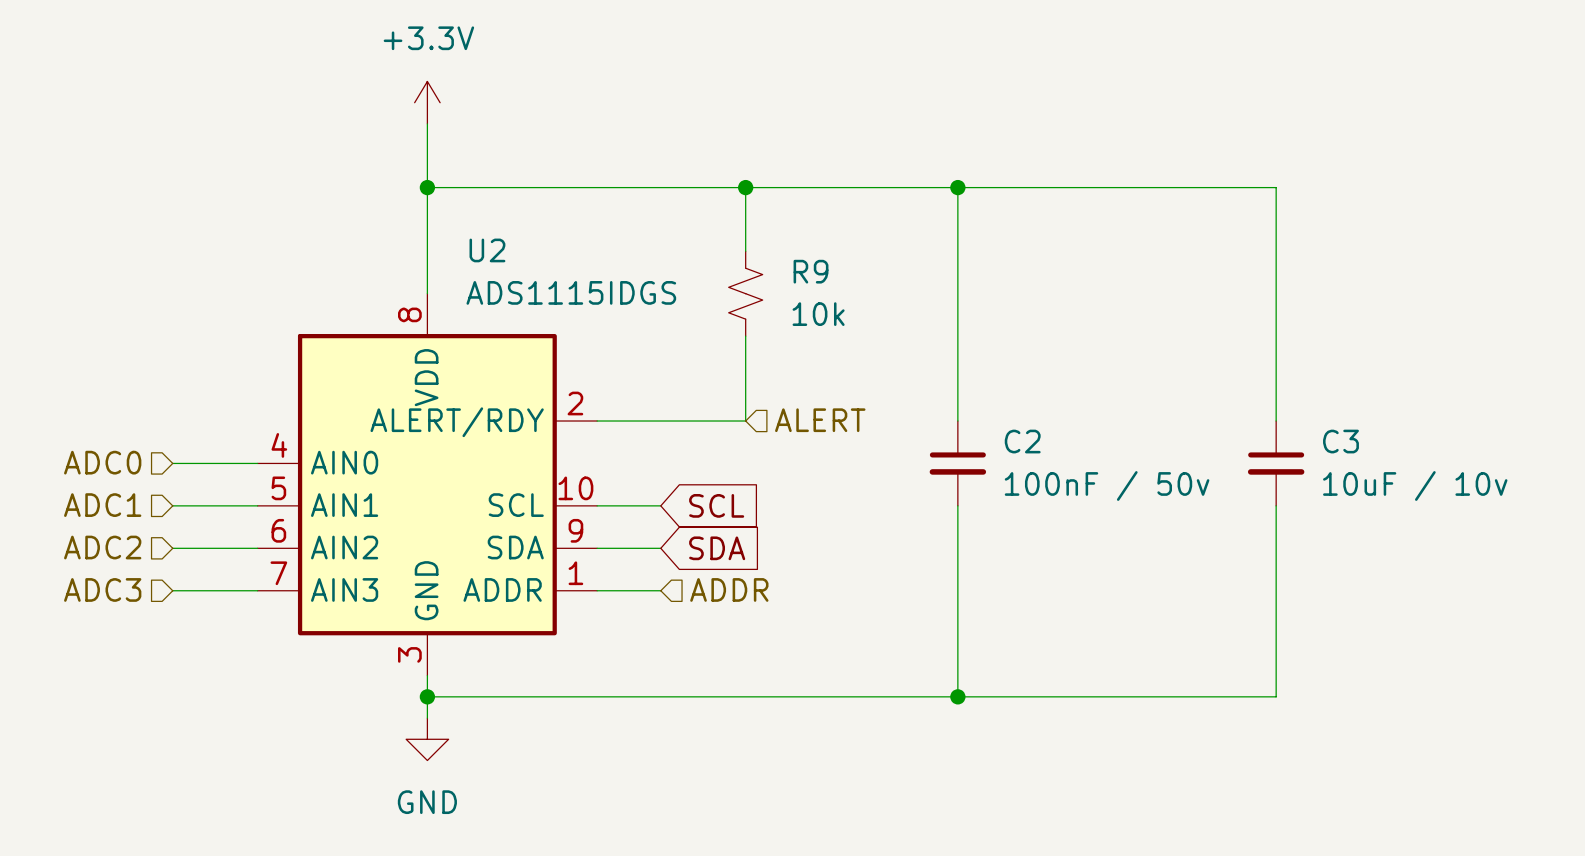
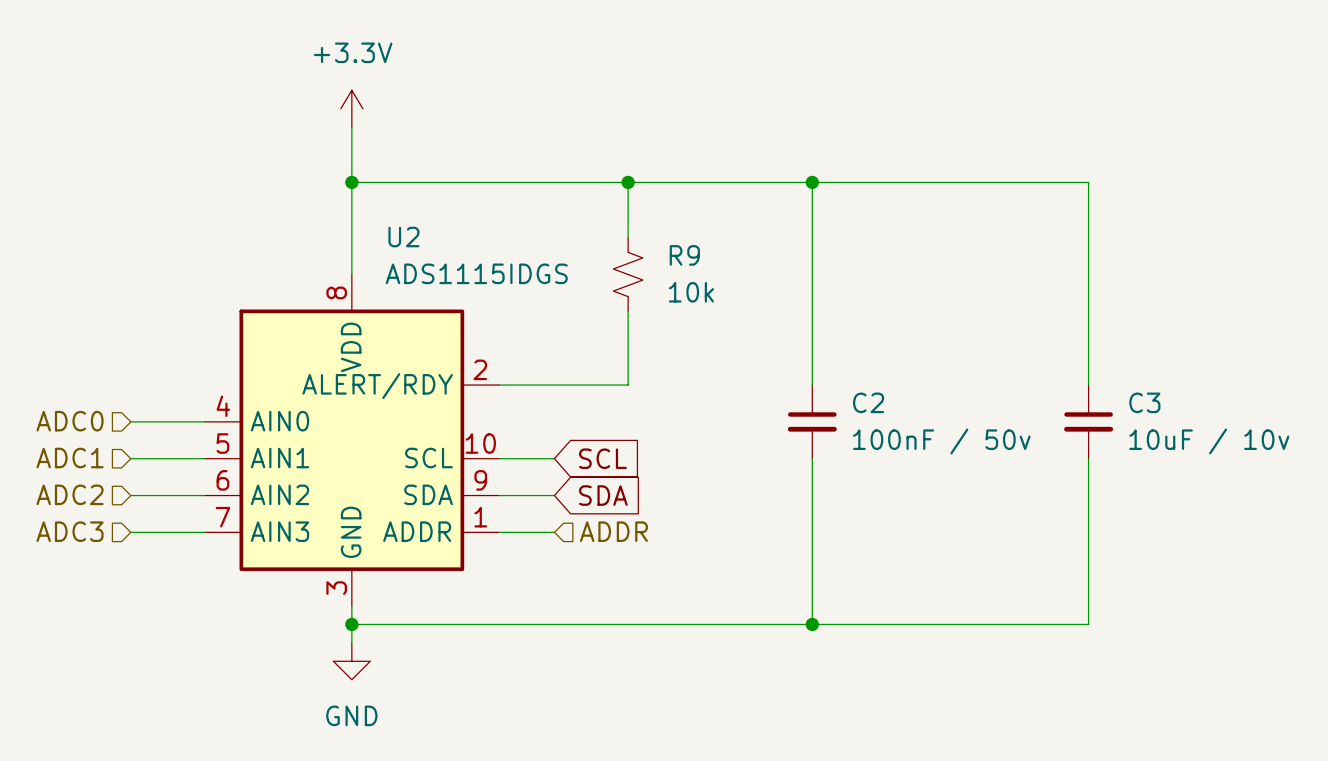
hierarchical label: ALERT (820, 420) -> none

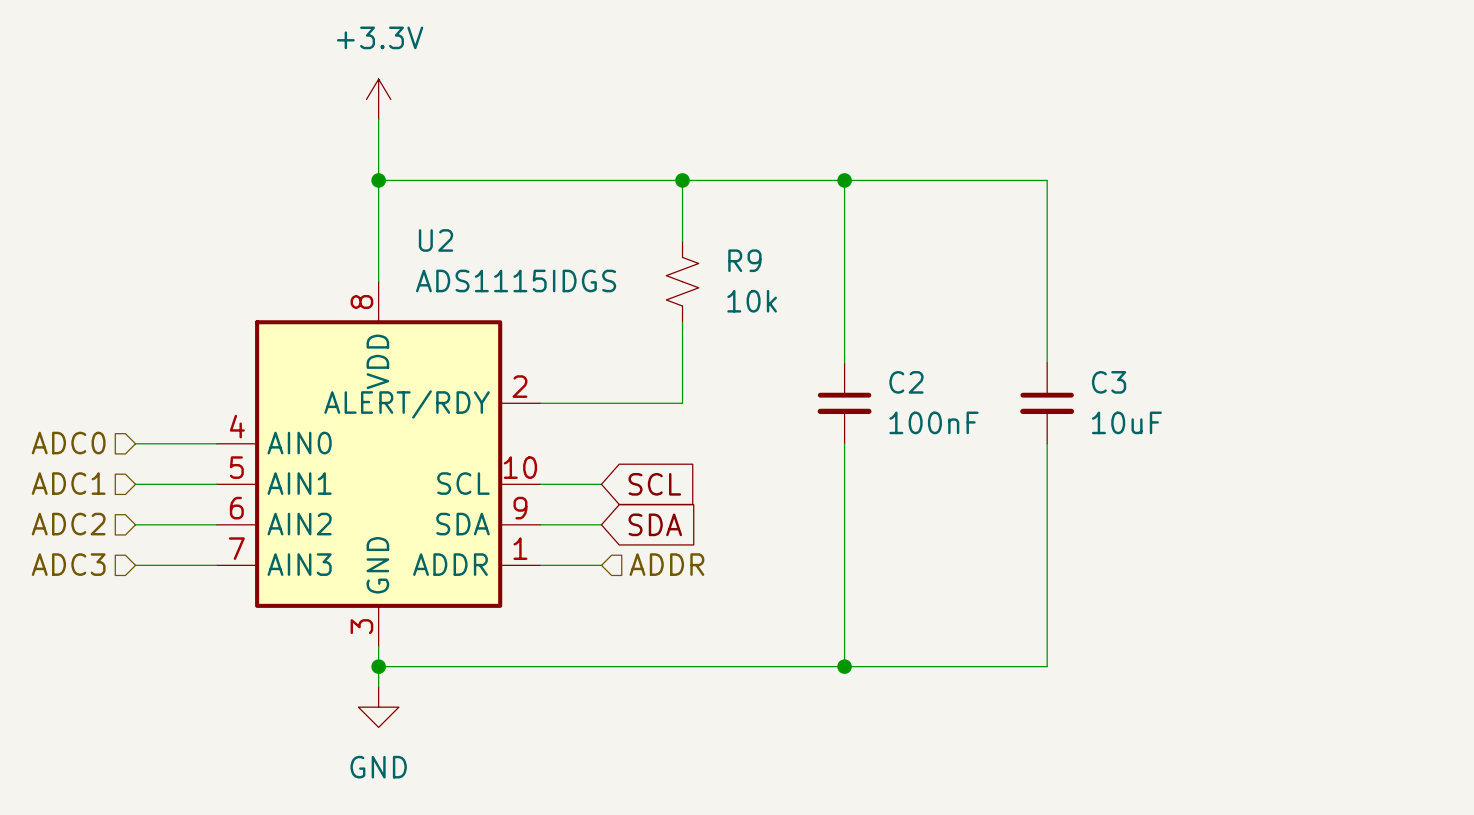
wire: (812, 182) (812, 385) -> (844, 443) (844, 666)
junction position: (812, 182) -> (844, 180)
wire: (959, 182) (1088, 182) (1088, 385) -> (1047, 180) (1047, 362)
C2 position: (812, 421) -> (844, 403)
C3 position: (1088, 421) -> (1047, 403)
C2 value: 100nF / 50v (941, 441) -> 100nF (933, 422)
C3 value: 10uF / 10v (1209, 441) -> 10uF (1126, 422)
wire: (812, 458) (812, 624) -> (844, 180) (844, 362)
wire: (1088, 458) (1088, 624) (959, 624) -> (1047, 443) (1047, 666)
junction position: (812, 624) -> (844, 666)

